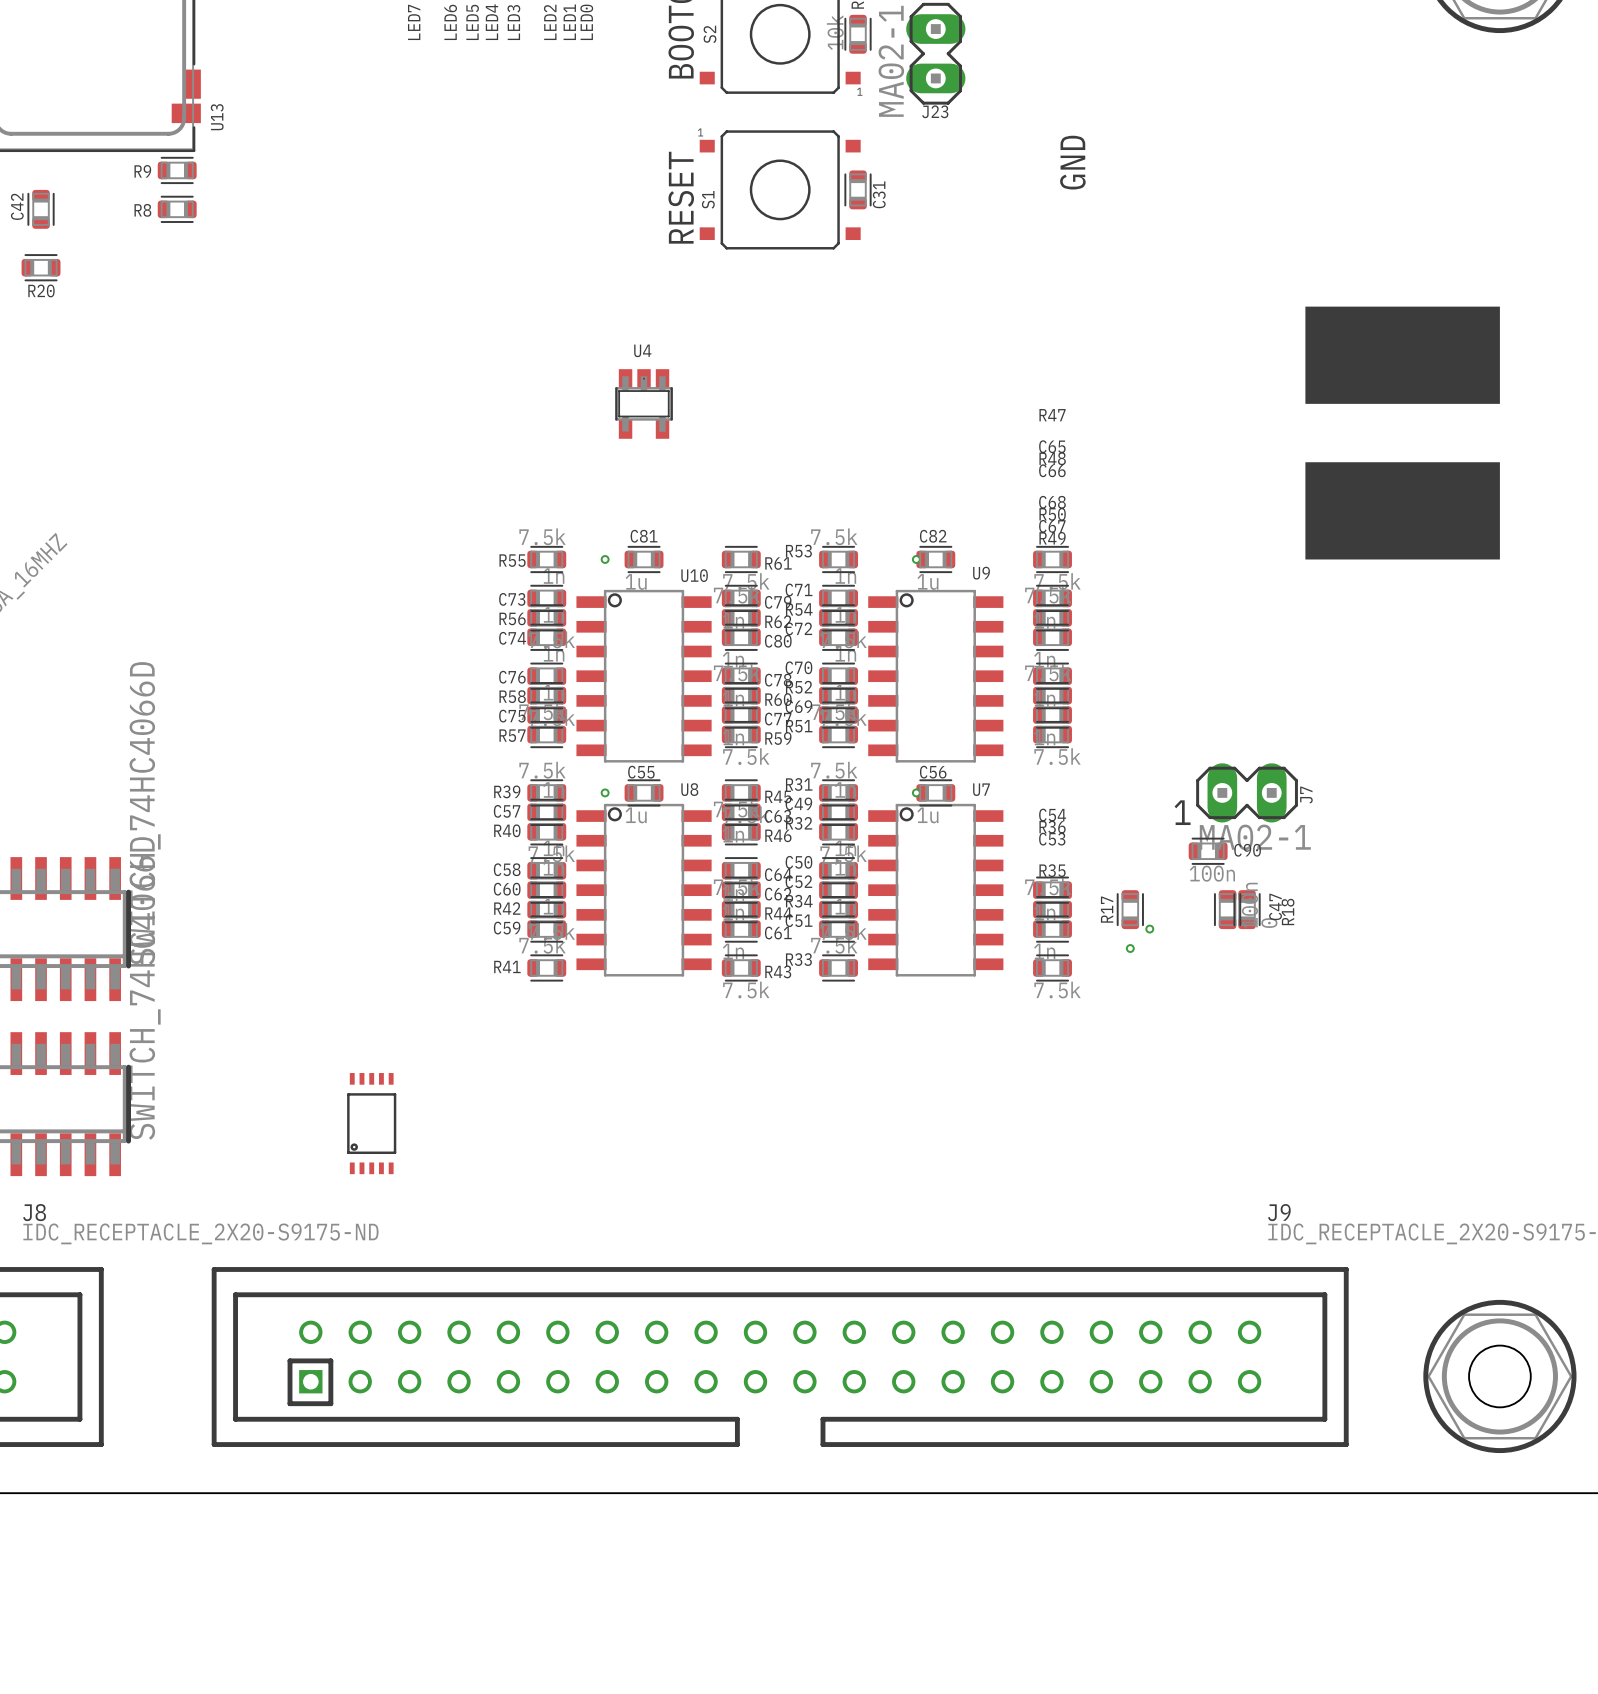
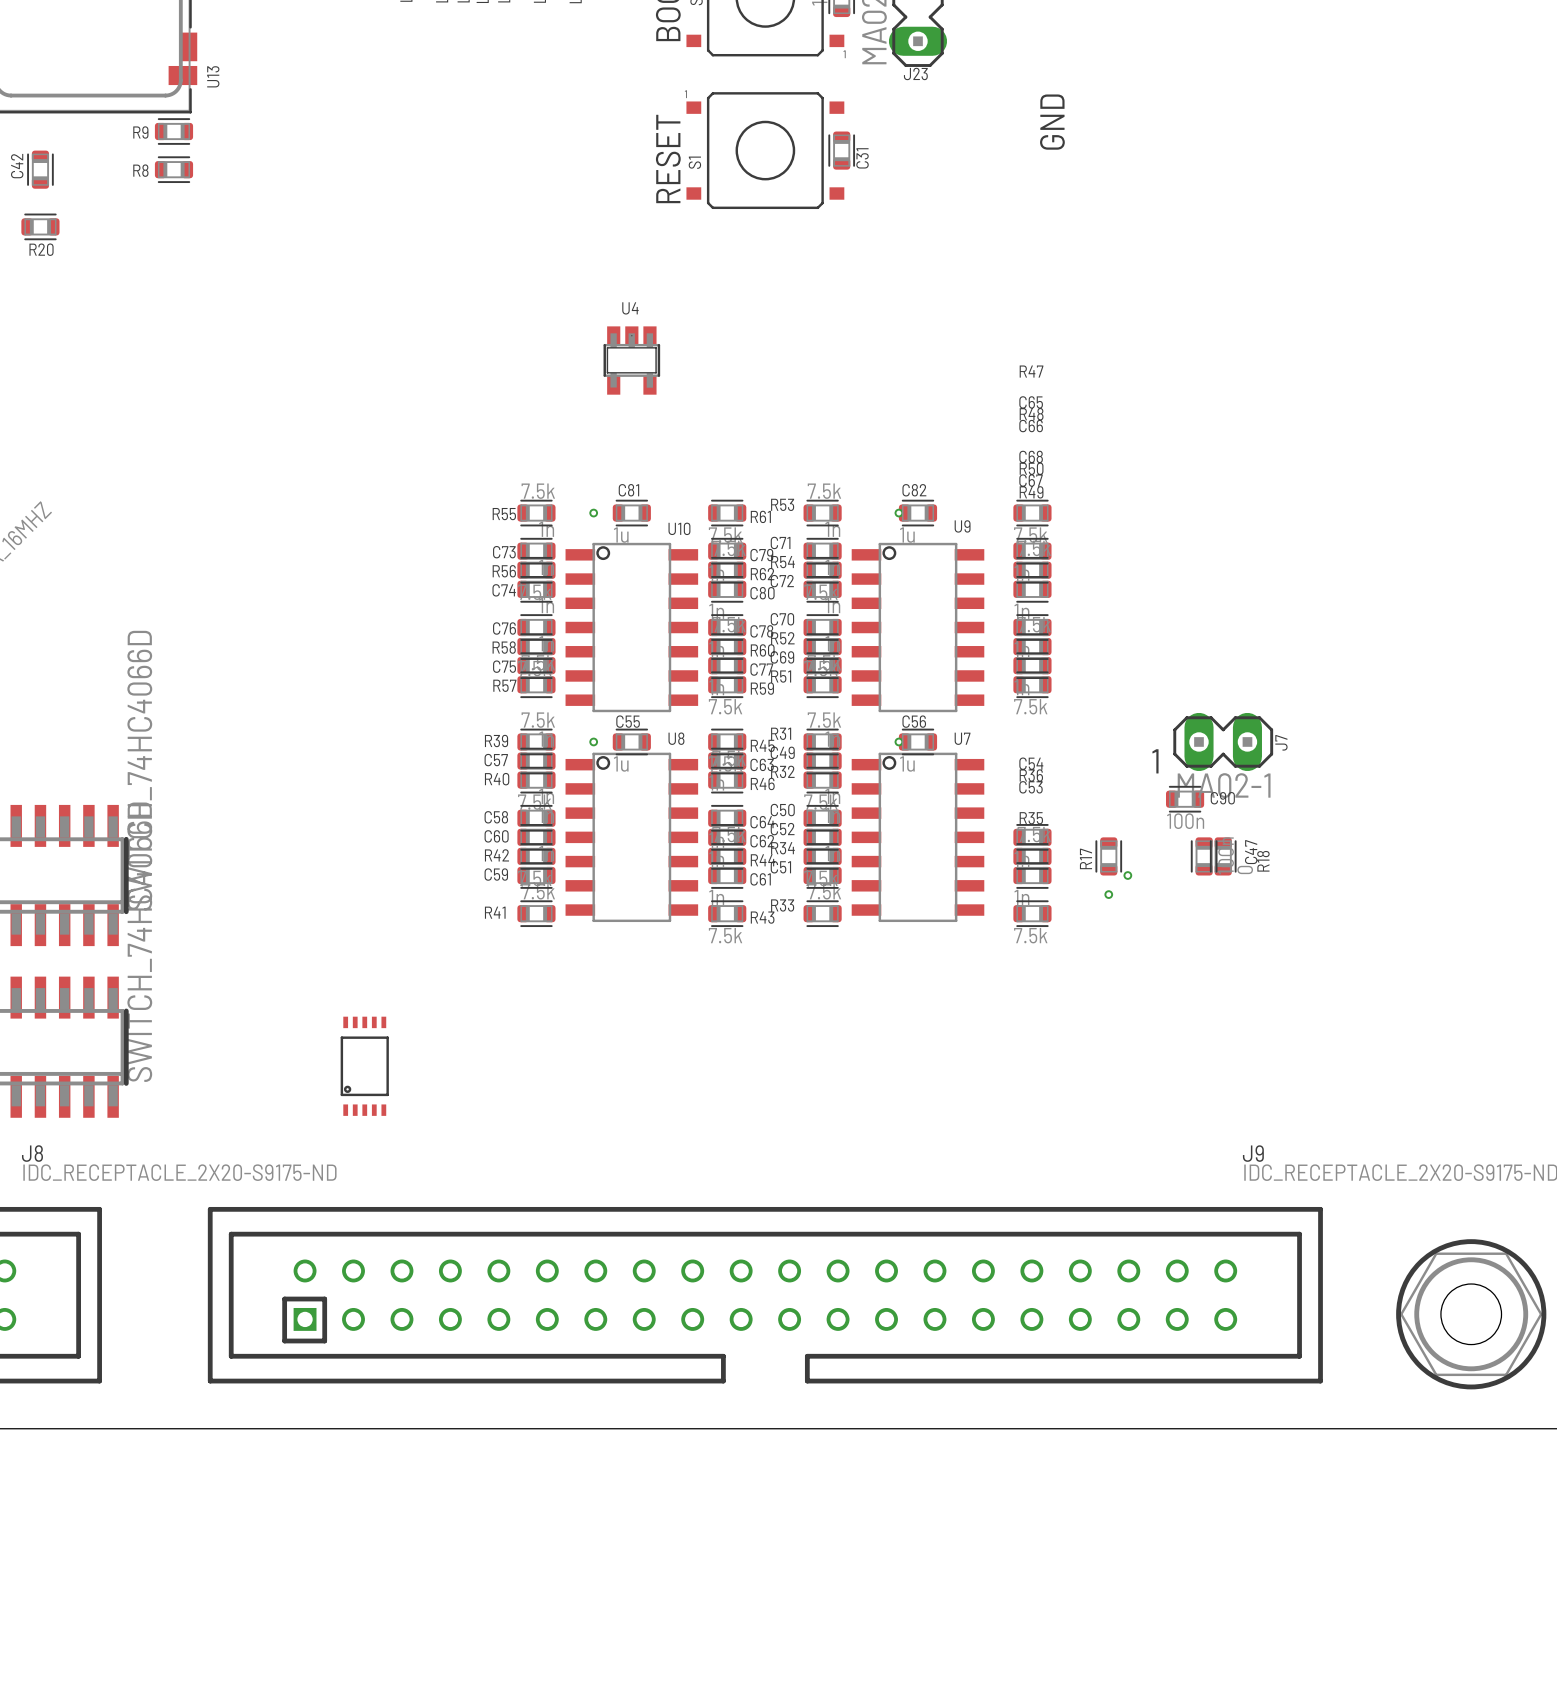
drawing: [1305, 306, 1500, 404] -> none
drawing: [1305, 462, 1500, 560] -> none

